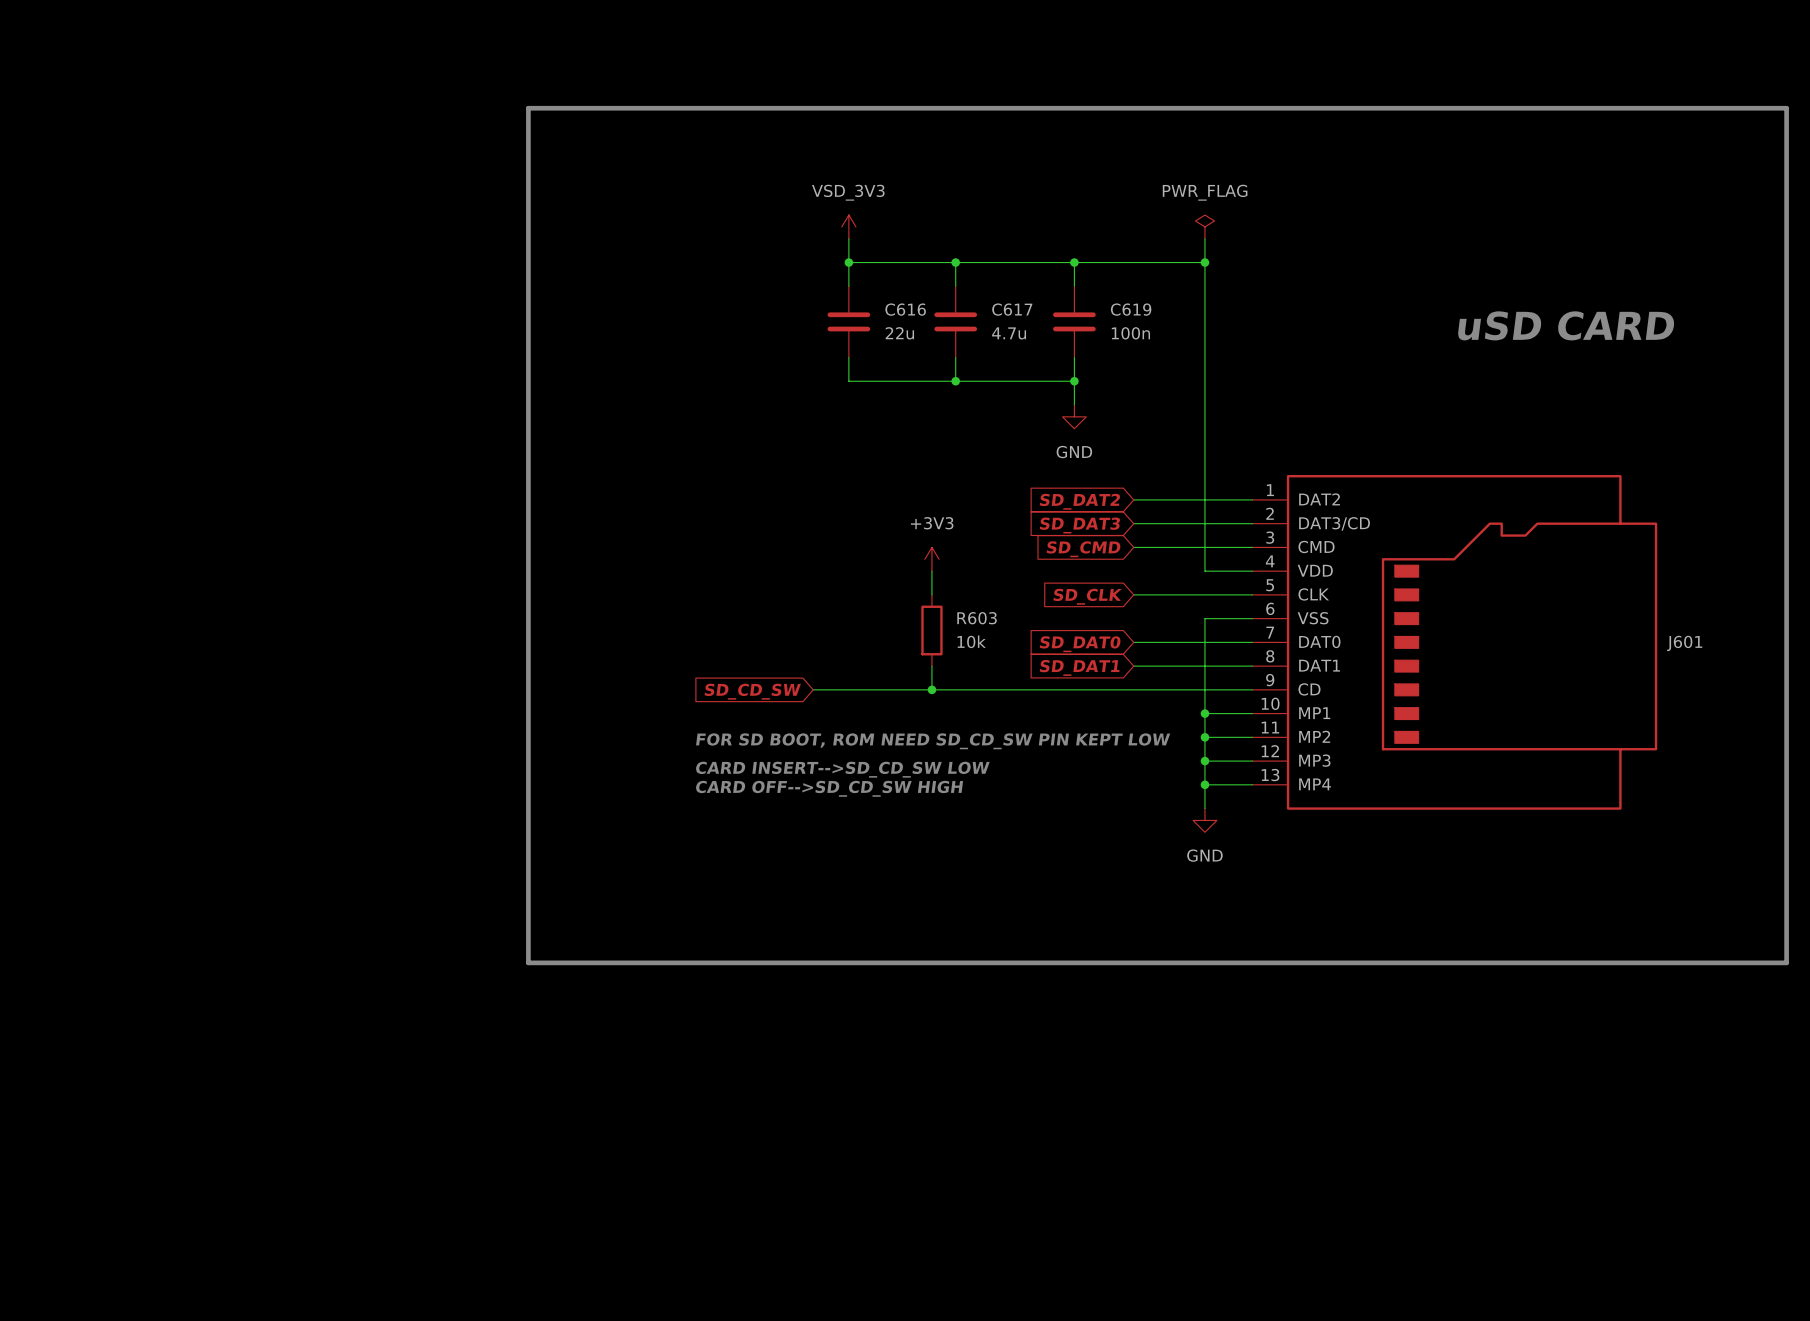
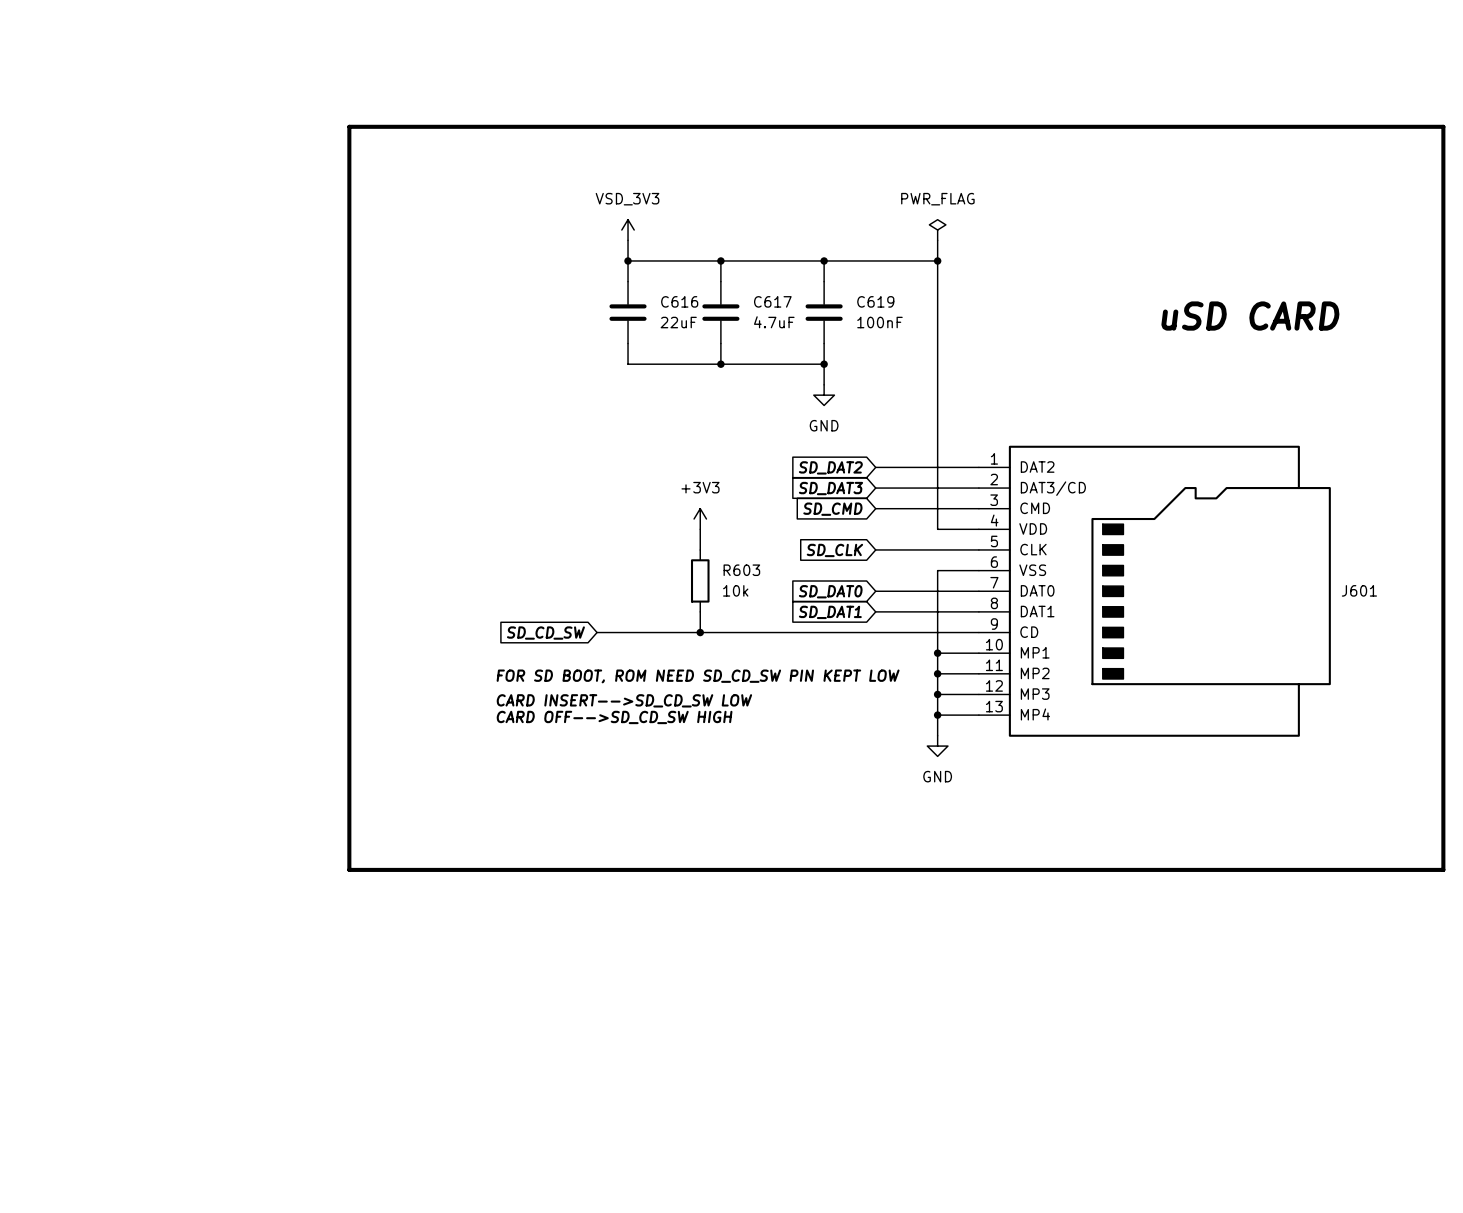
C616 value: 22u (899, 333) -> 22uF (678, 322)
C617 value: 4.7u (1009, 333) -> 4.7uF (774, 322)
C619 value: 100n (1130, 333) -> 100nF (879, 322)

